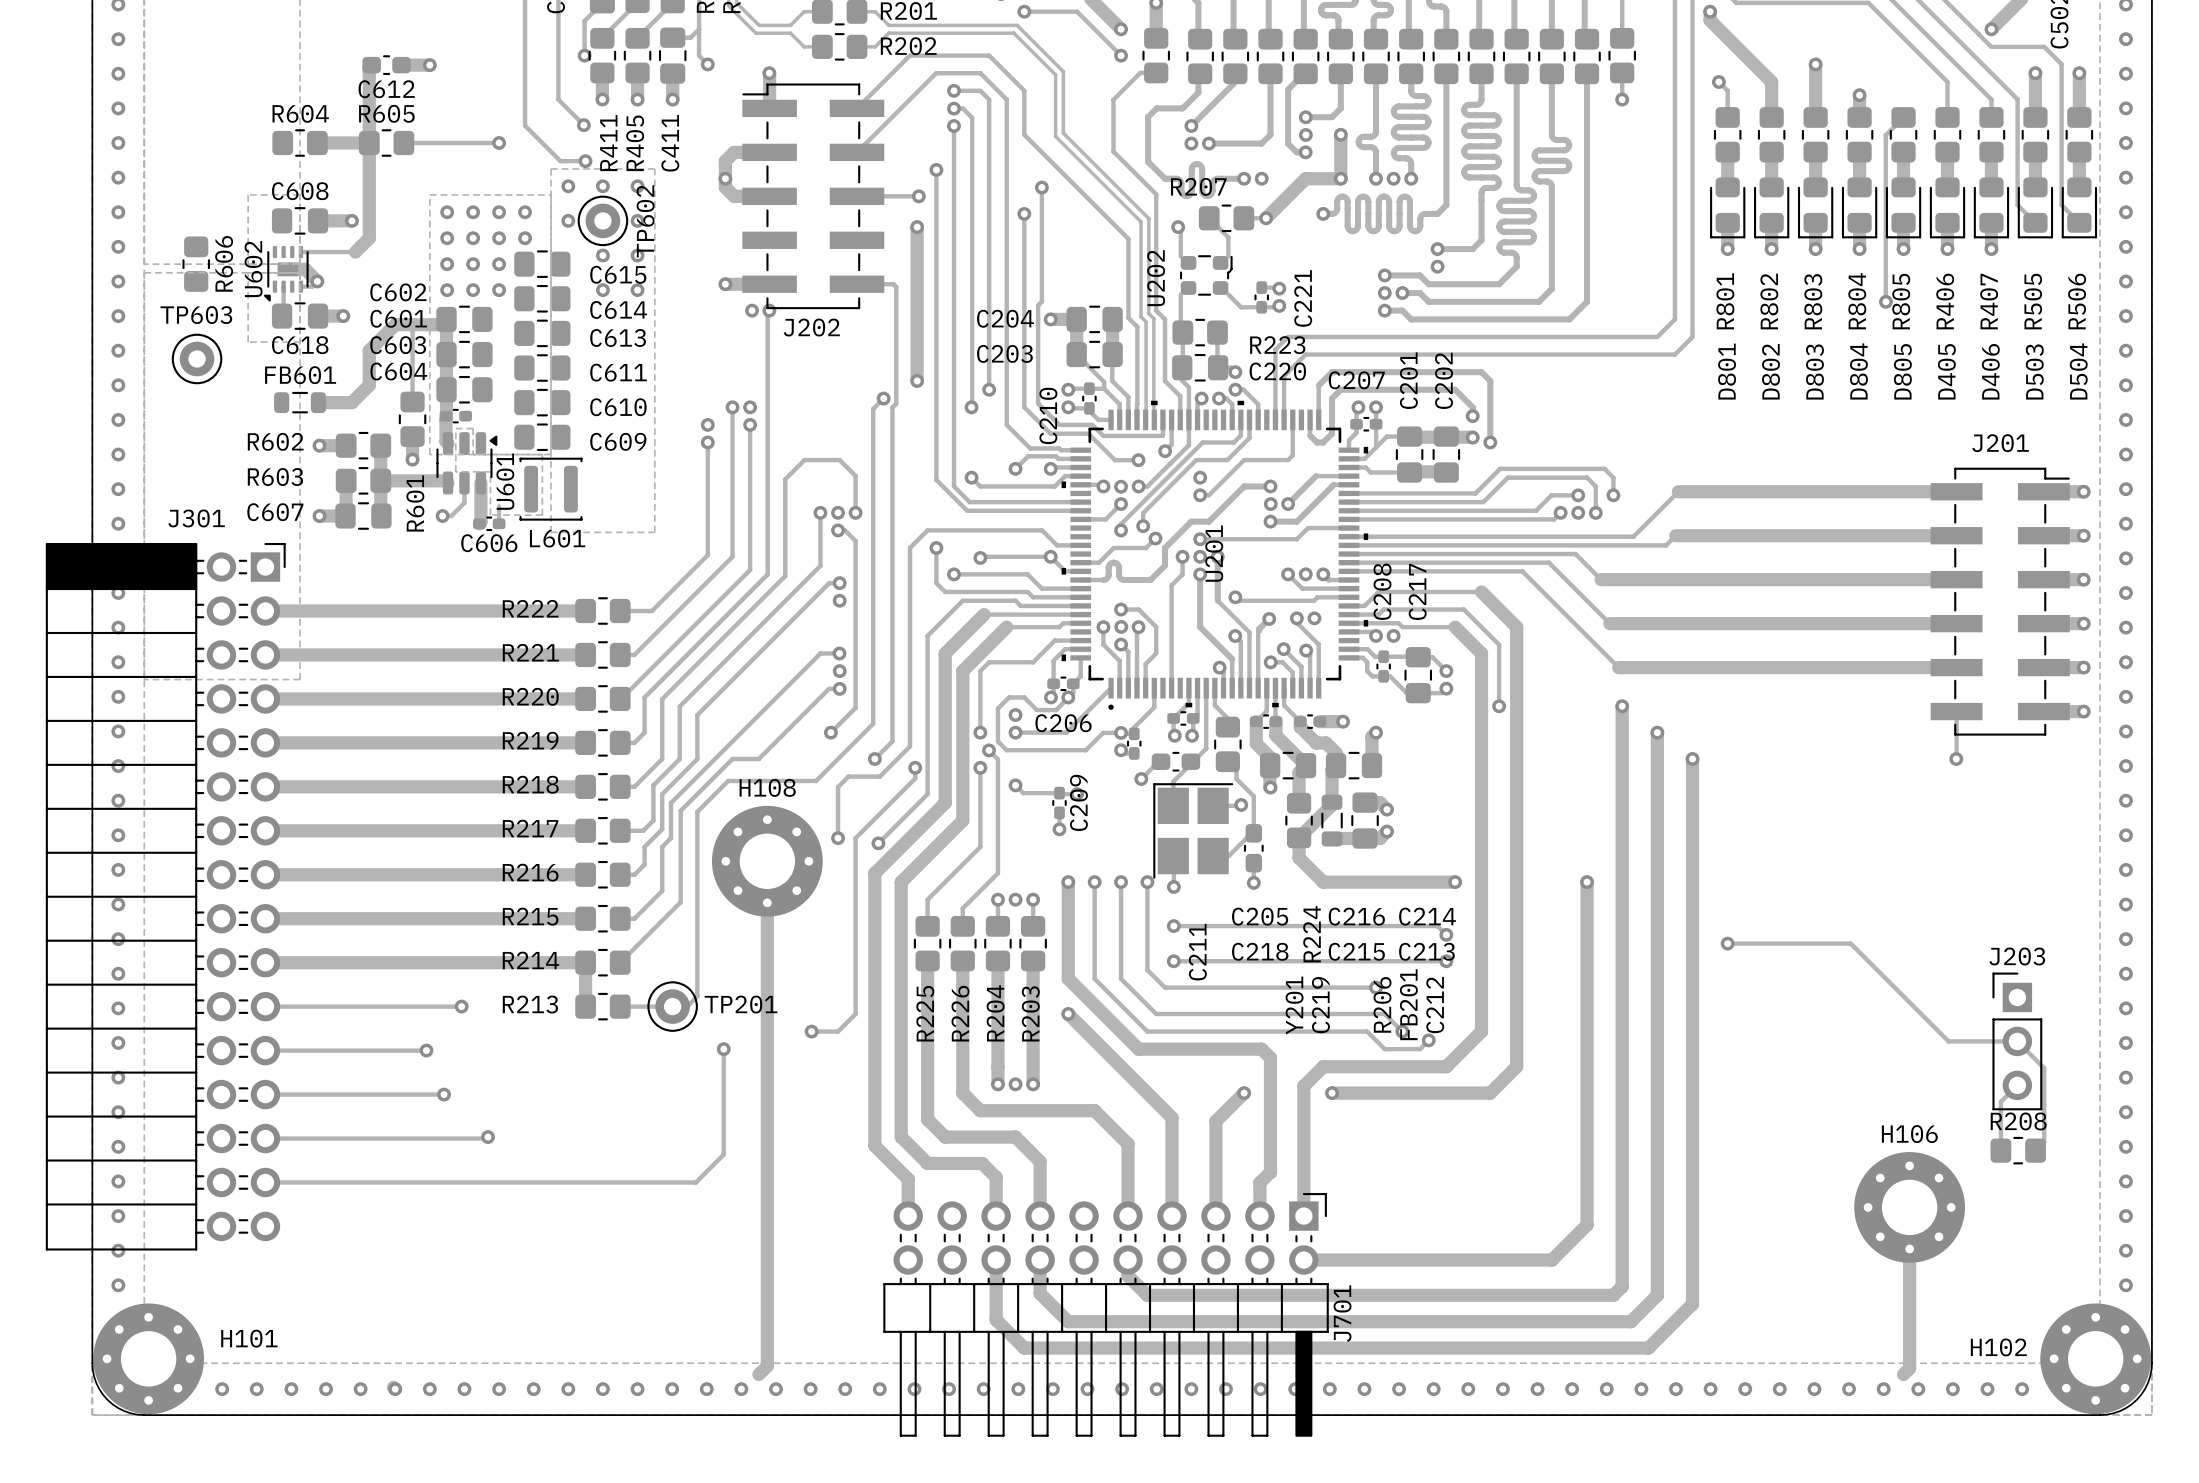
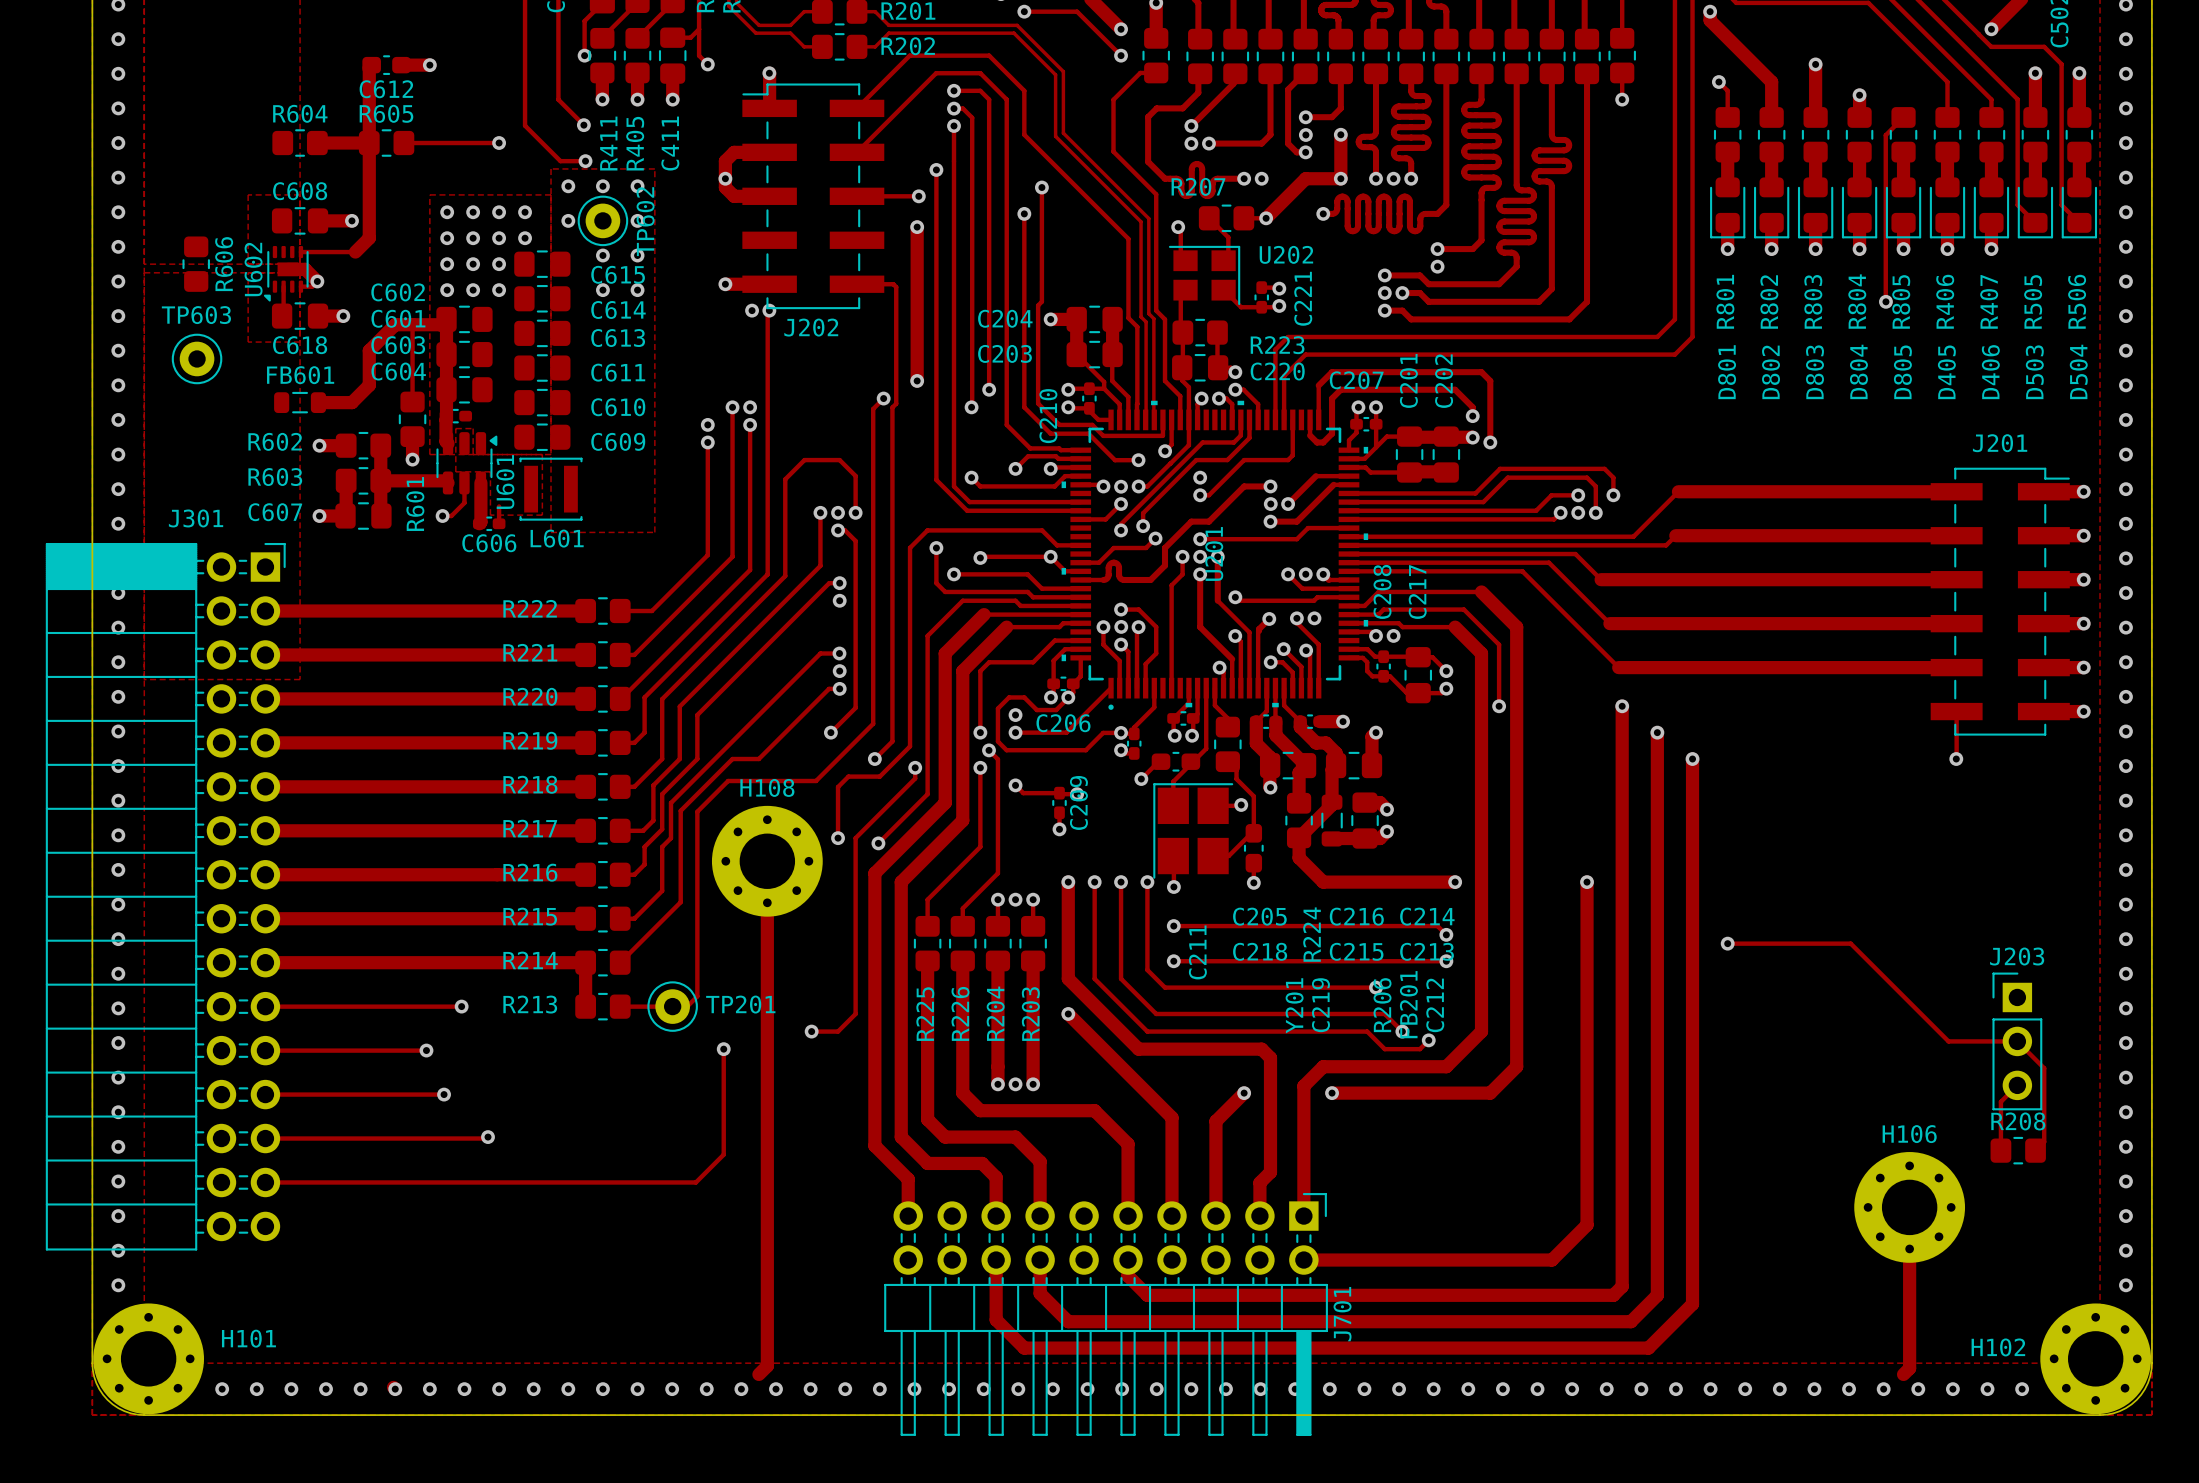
U202 footprint: [1179, 255, 1233, 296] -> [1168, 245, 1241, 306]
U202 name position: U202 (1156, 278) -> U202 (1286, 254)
L601 footprint: [519, 457, 583, 521] -> [519, 457, 583, 521]
J701 footprint: [883, 1193, 1329, 1437] -> [884, 1193, 1328, 1436]

